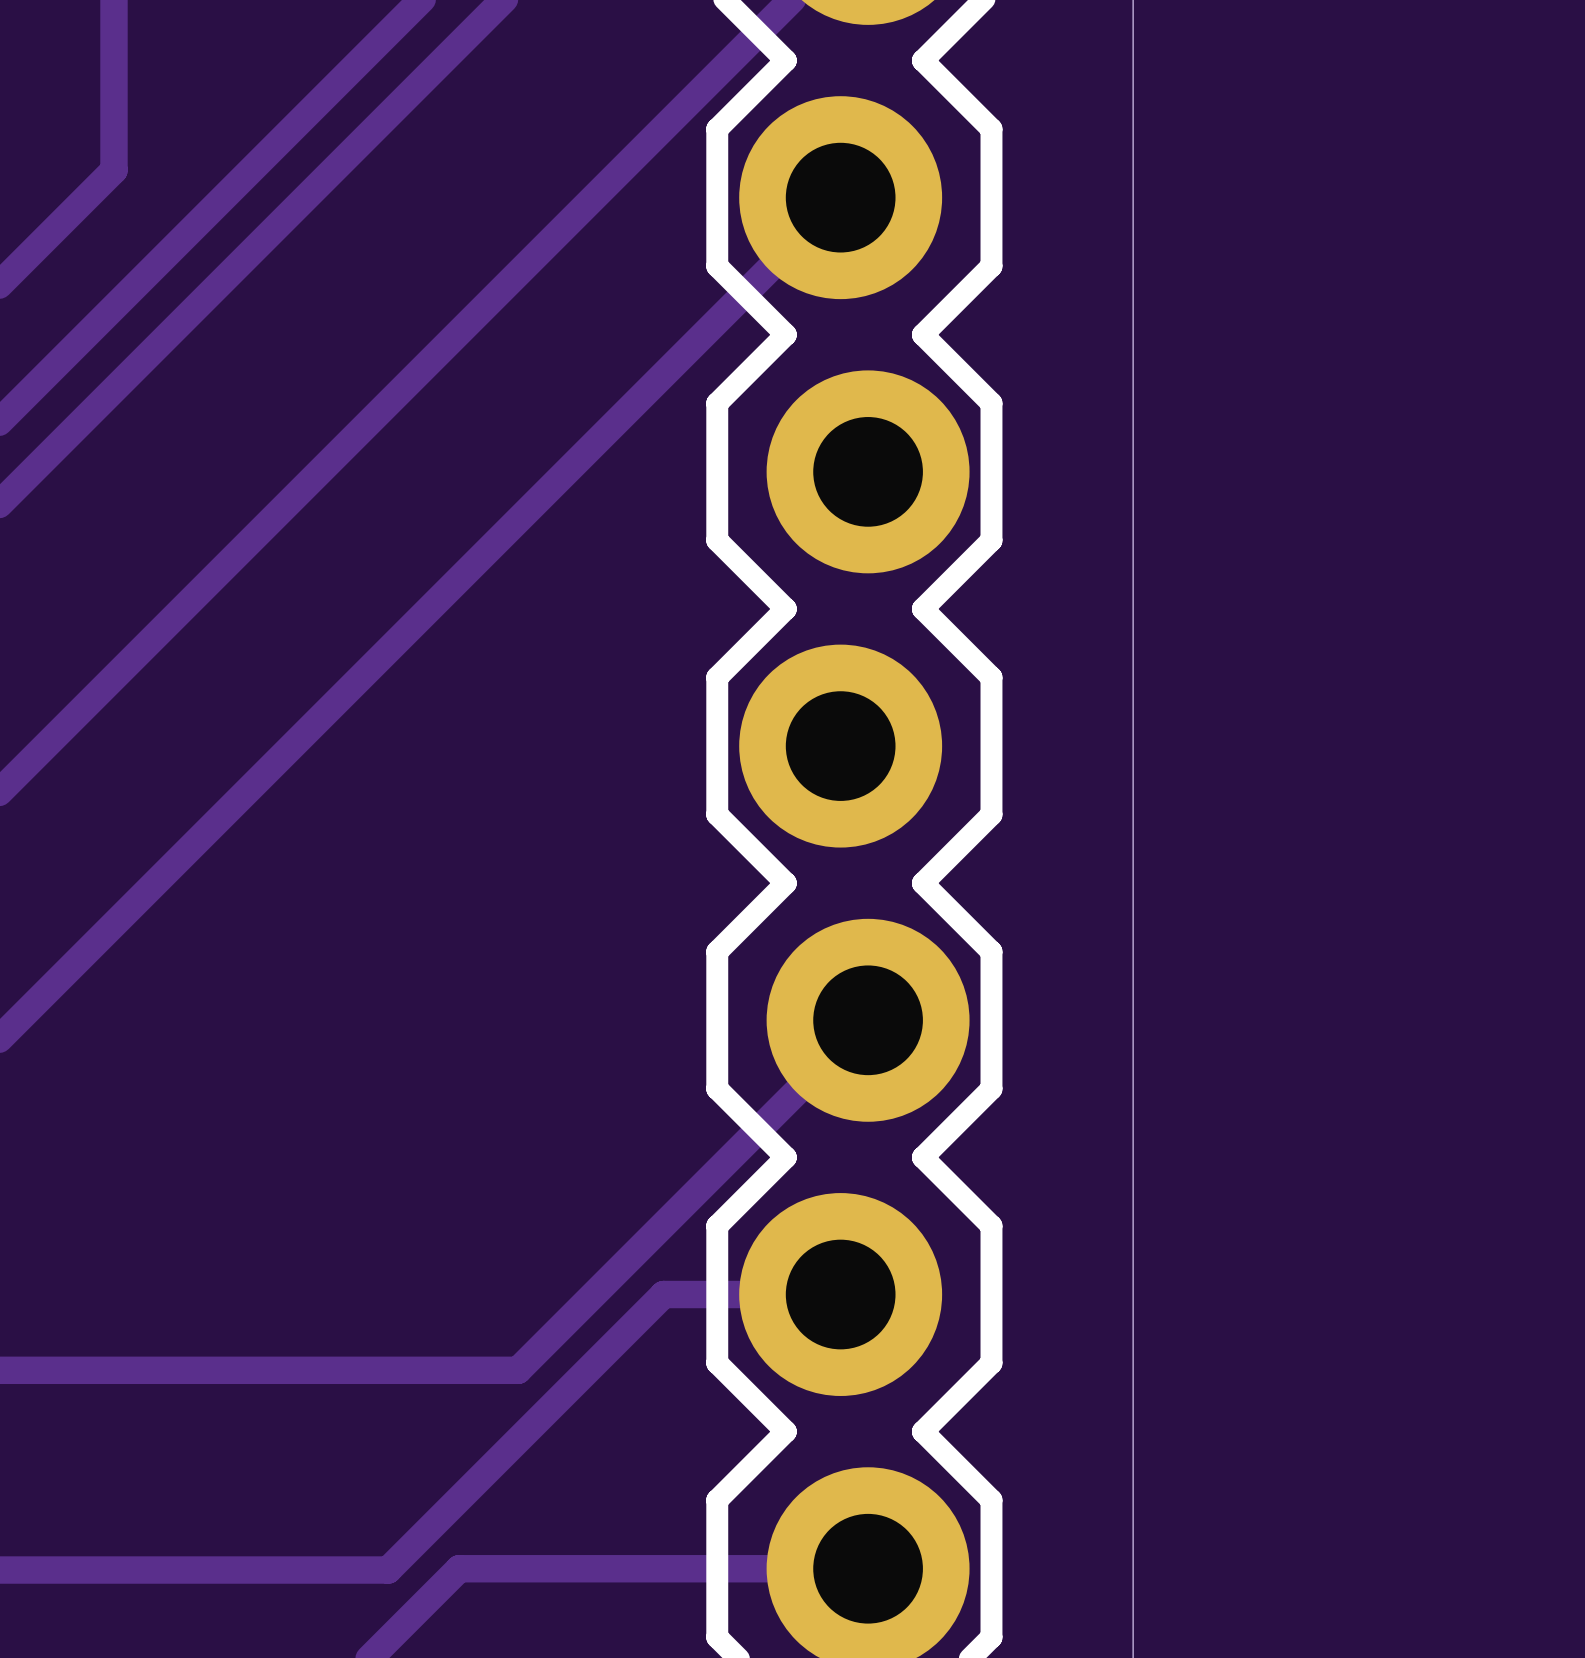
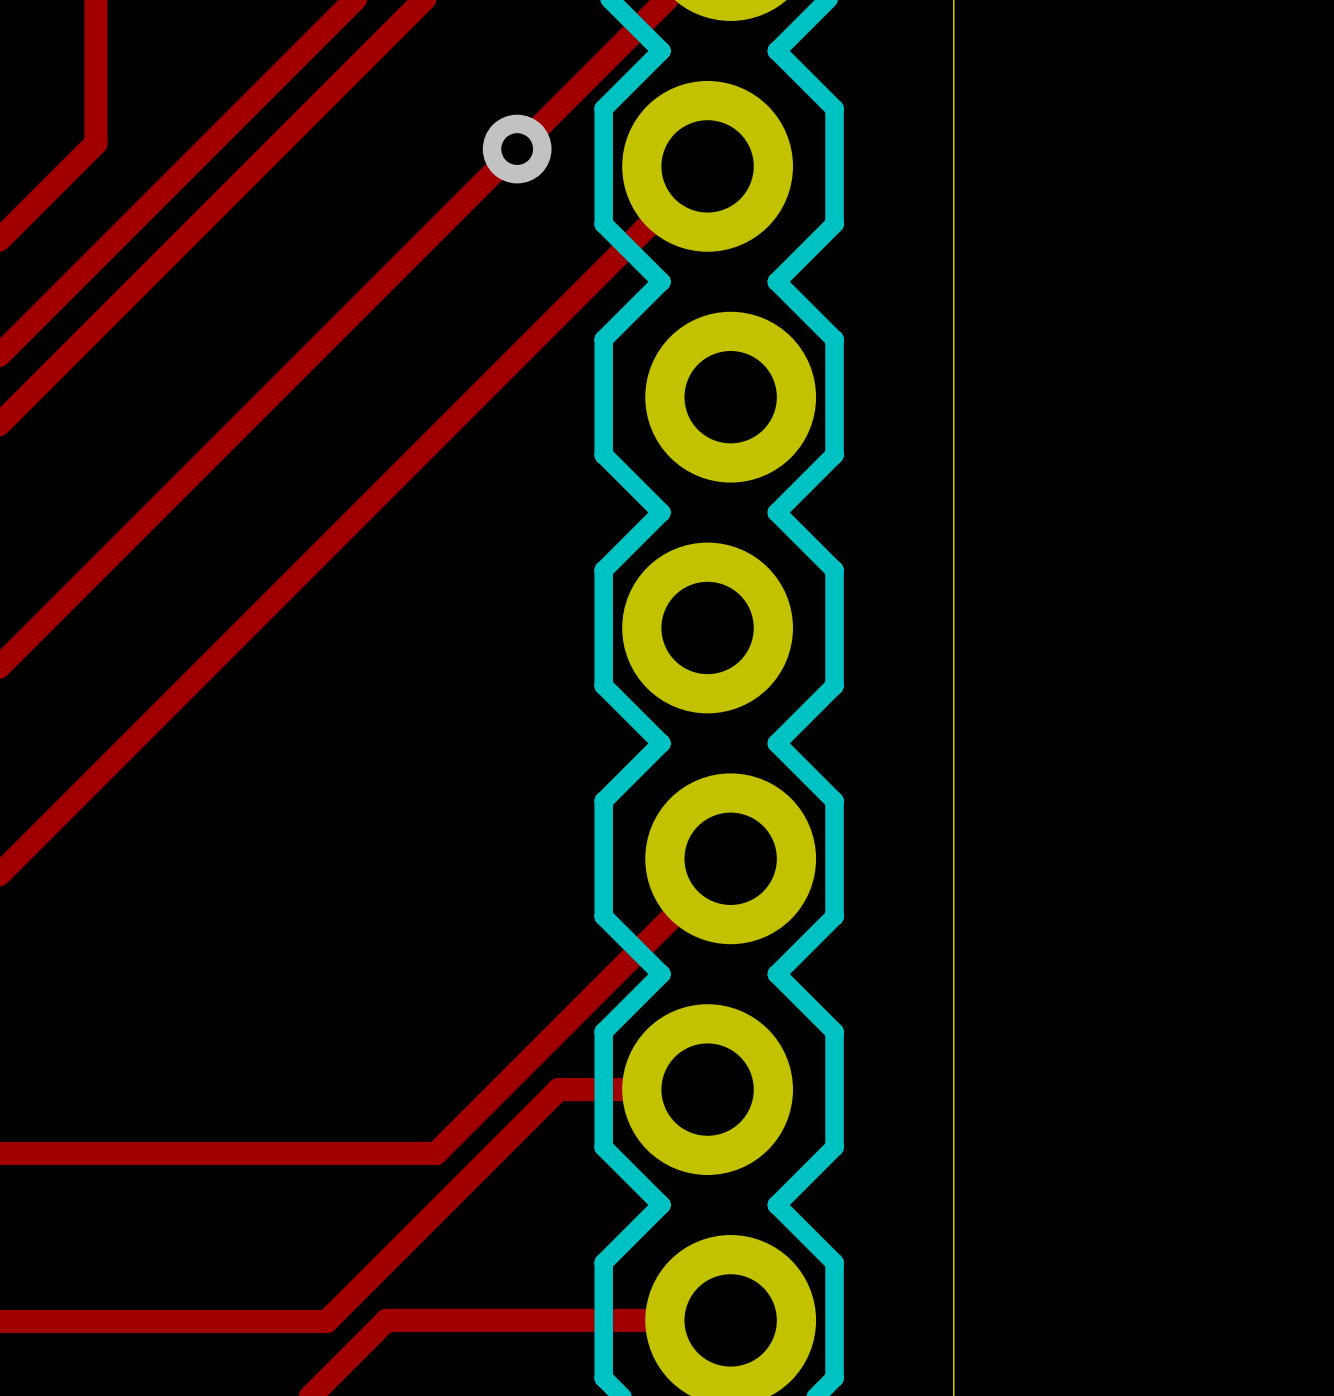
via: none -> (517, 149)

